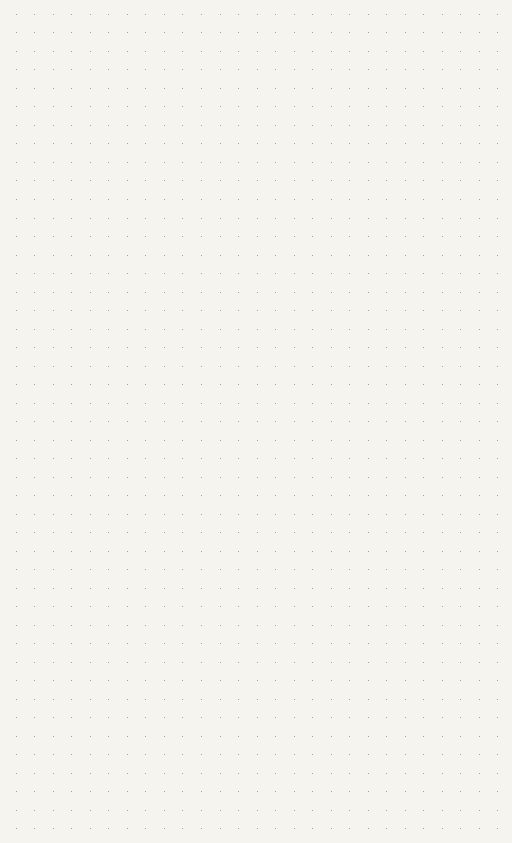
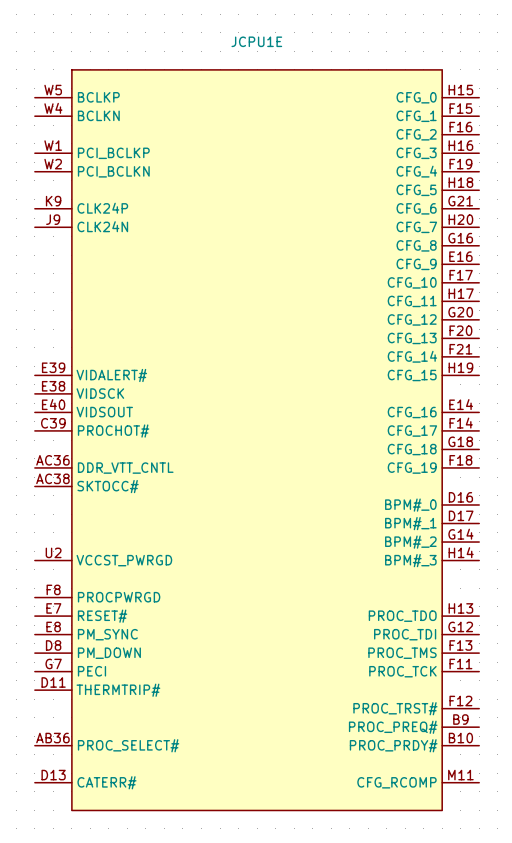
JCPU1E: none -> (257, 440)

